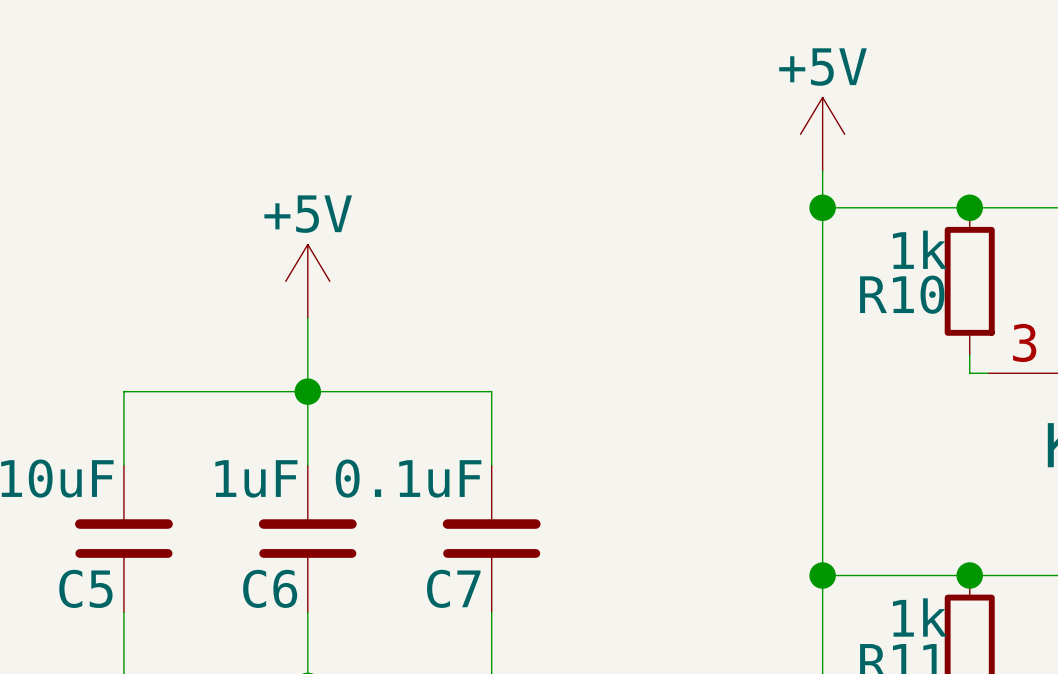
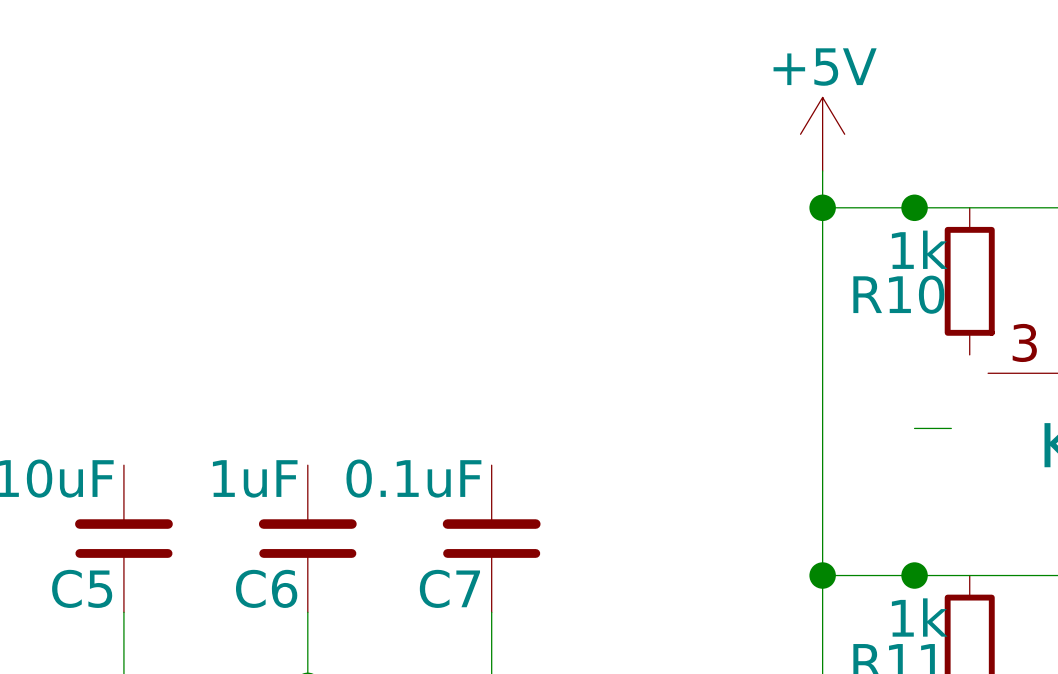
junction position: (969, 207) -> (914, 207)
power symbol: +5V (307, 281) -> none
wire: (307, 318) (307, 465) -> none
wire: (969, 354) (969, 373) (988, 373) -> none
junction: (307, 391) -> none
wire: none -> (914, 428) (951, 428)
wire: (123, 465) (123, 391) (491, 391) (491, 465) -> none
junction position: (969, 575) -> (914, 575)

